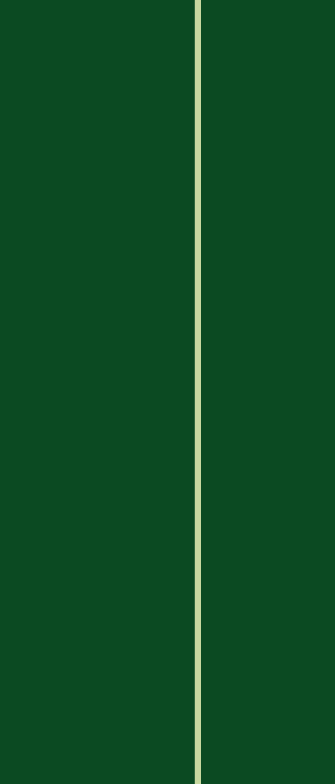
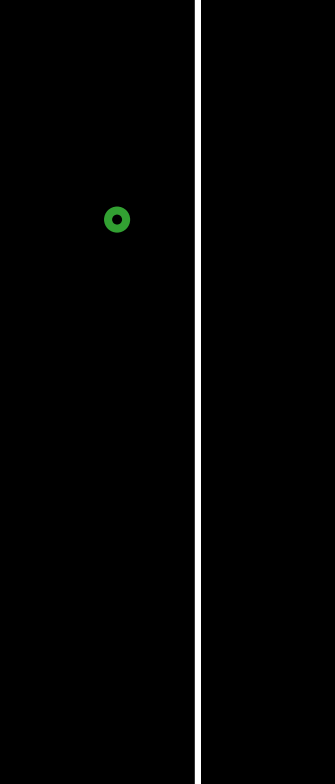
via: none -> (117, 219)

